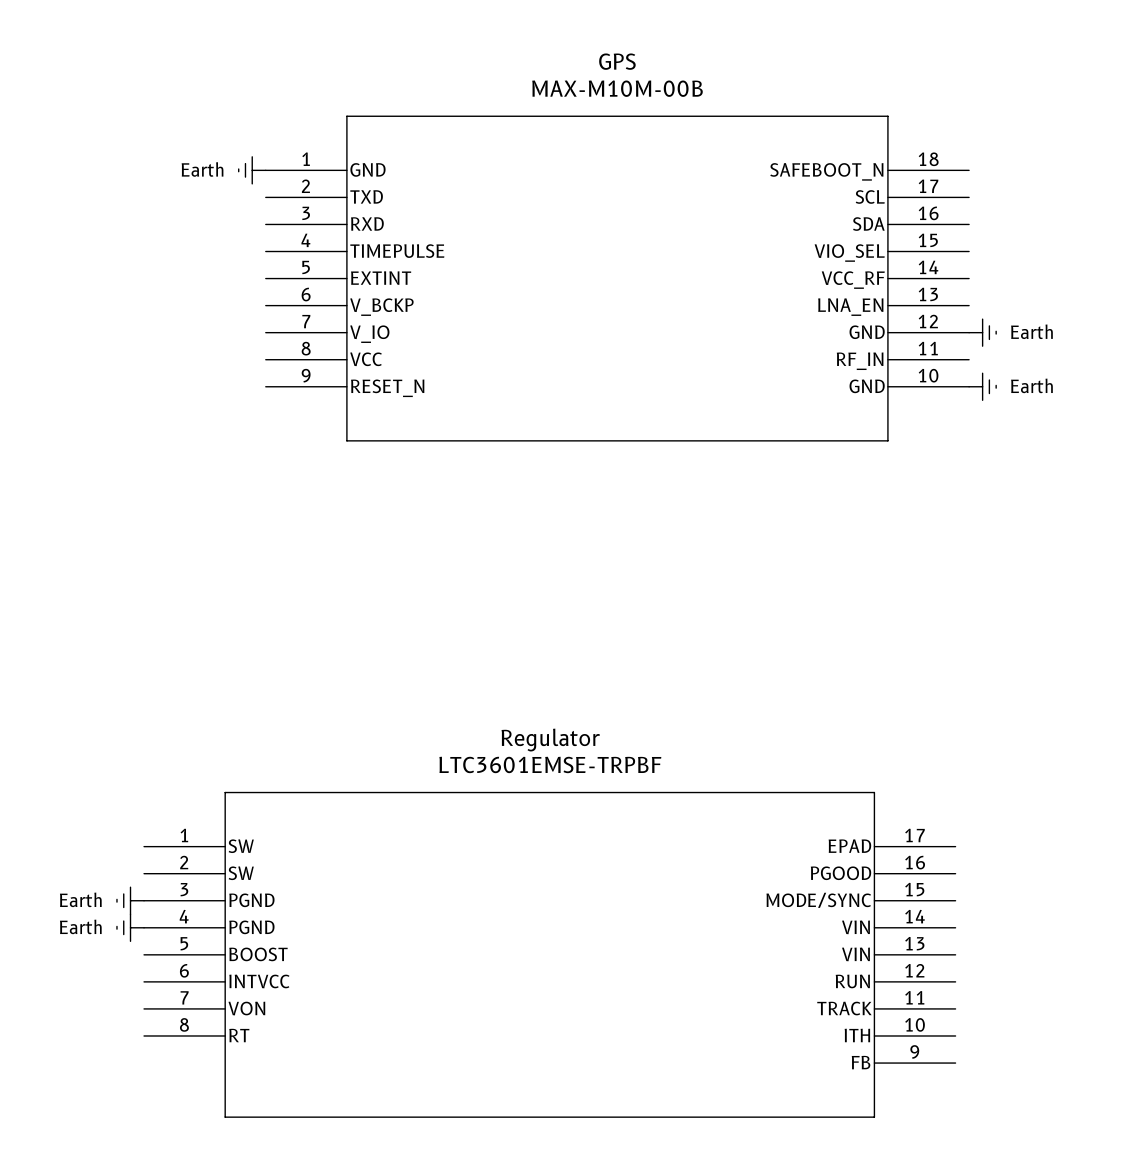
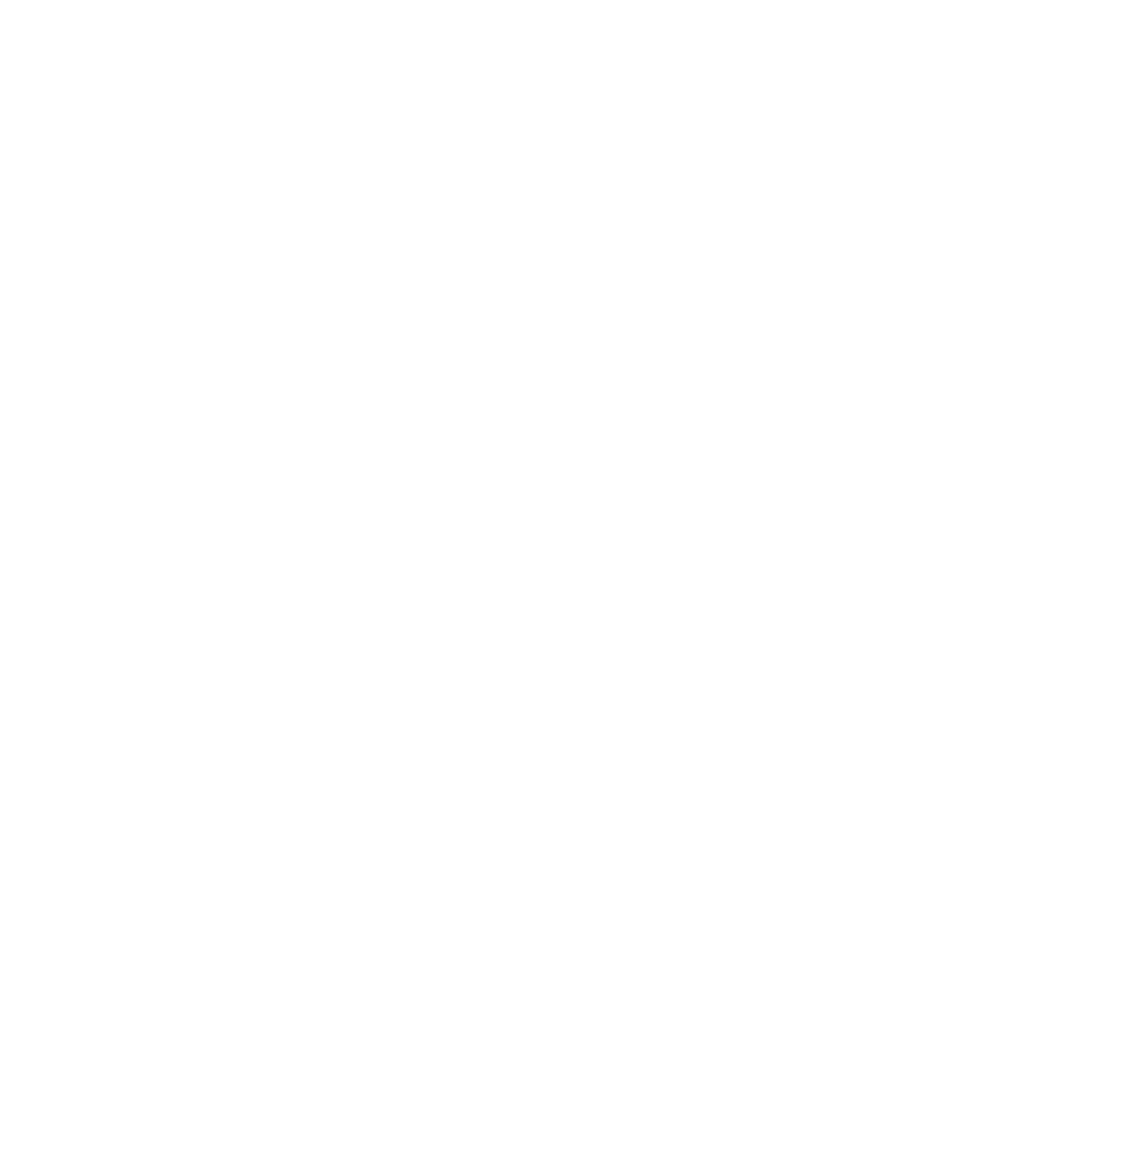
power symbol: Earth (252, 170) -> none
GPS: MAX-M10M-00B (617, 278) -> none
power symbol: Earth (982, 332) -> none
power symbol: Earth (982, 386) -> none
power symbol: Earth (130, 900) -> none
power symbol: Earth (130, 927) -> none
Regulator: LTC3601EMSE-TRPBF (549, 954) -> none

